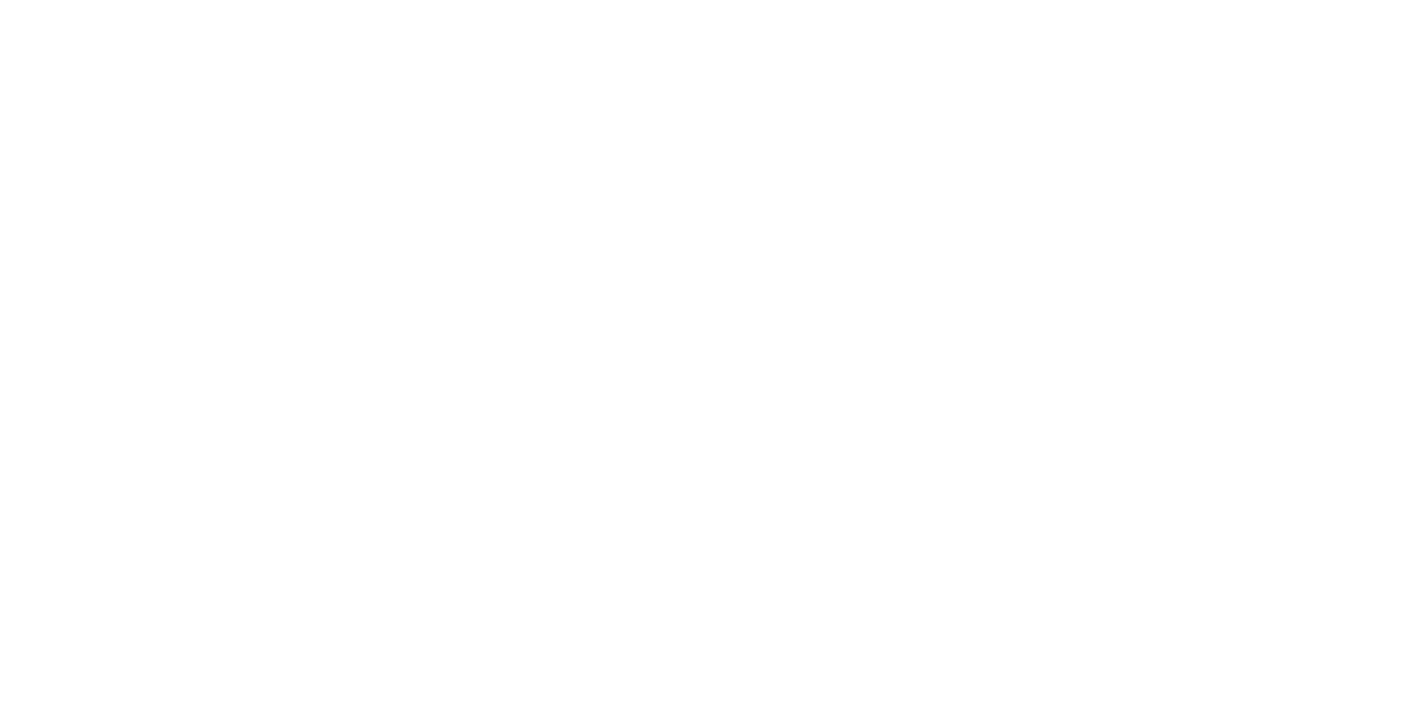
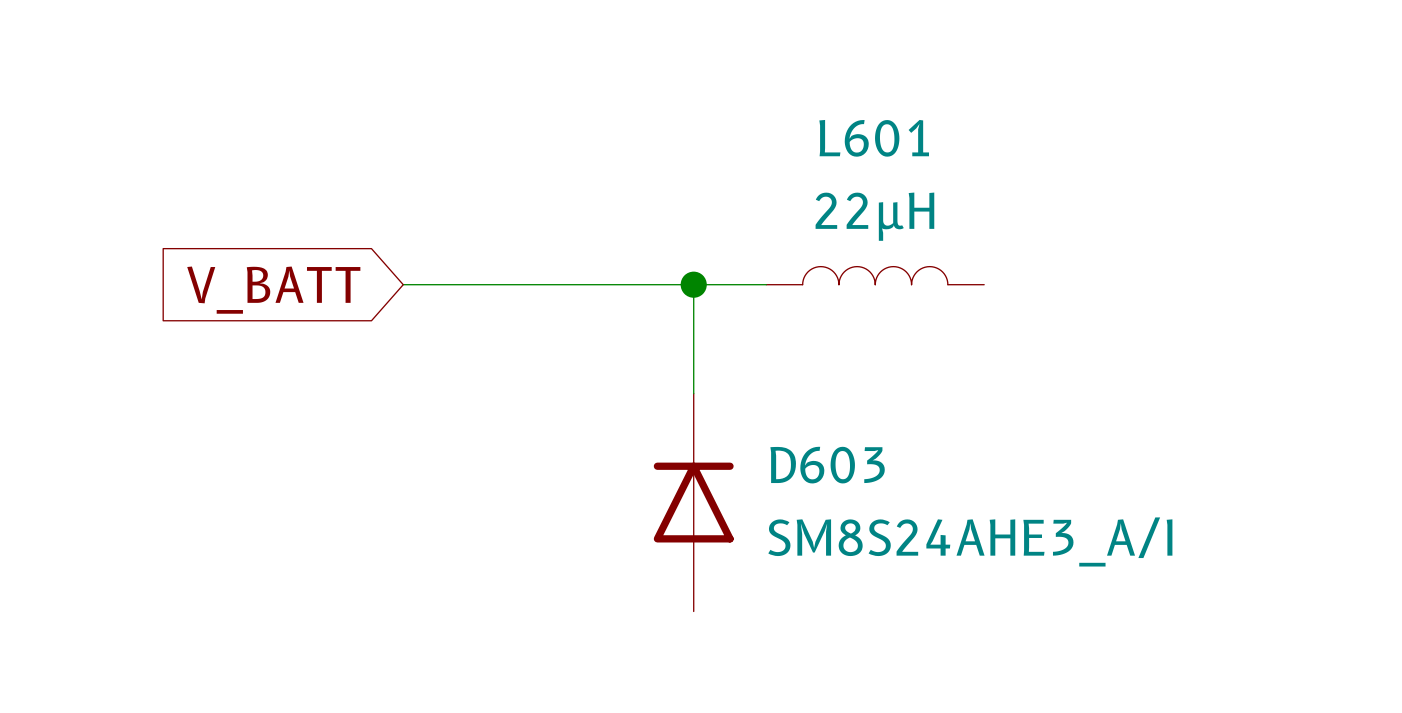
L601: none -> 22µH (875, 275)
wire: none -> (403, 284) (766, 284)
wire: none -> (693, 284) (693, 393)
junction: none -> (693, 284)
global label: none -> V_BATT (273, 290)
D603: none -> SM8S24AHE3_A/I (693, 502)

